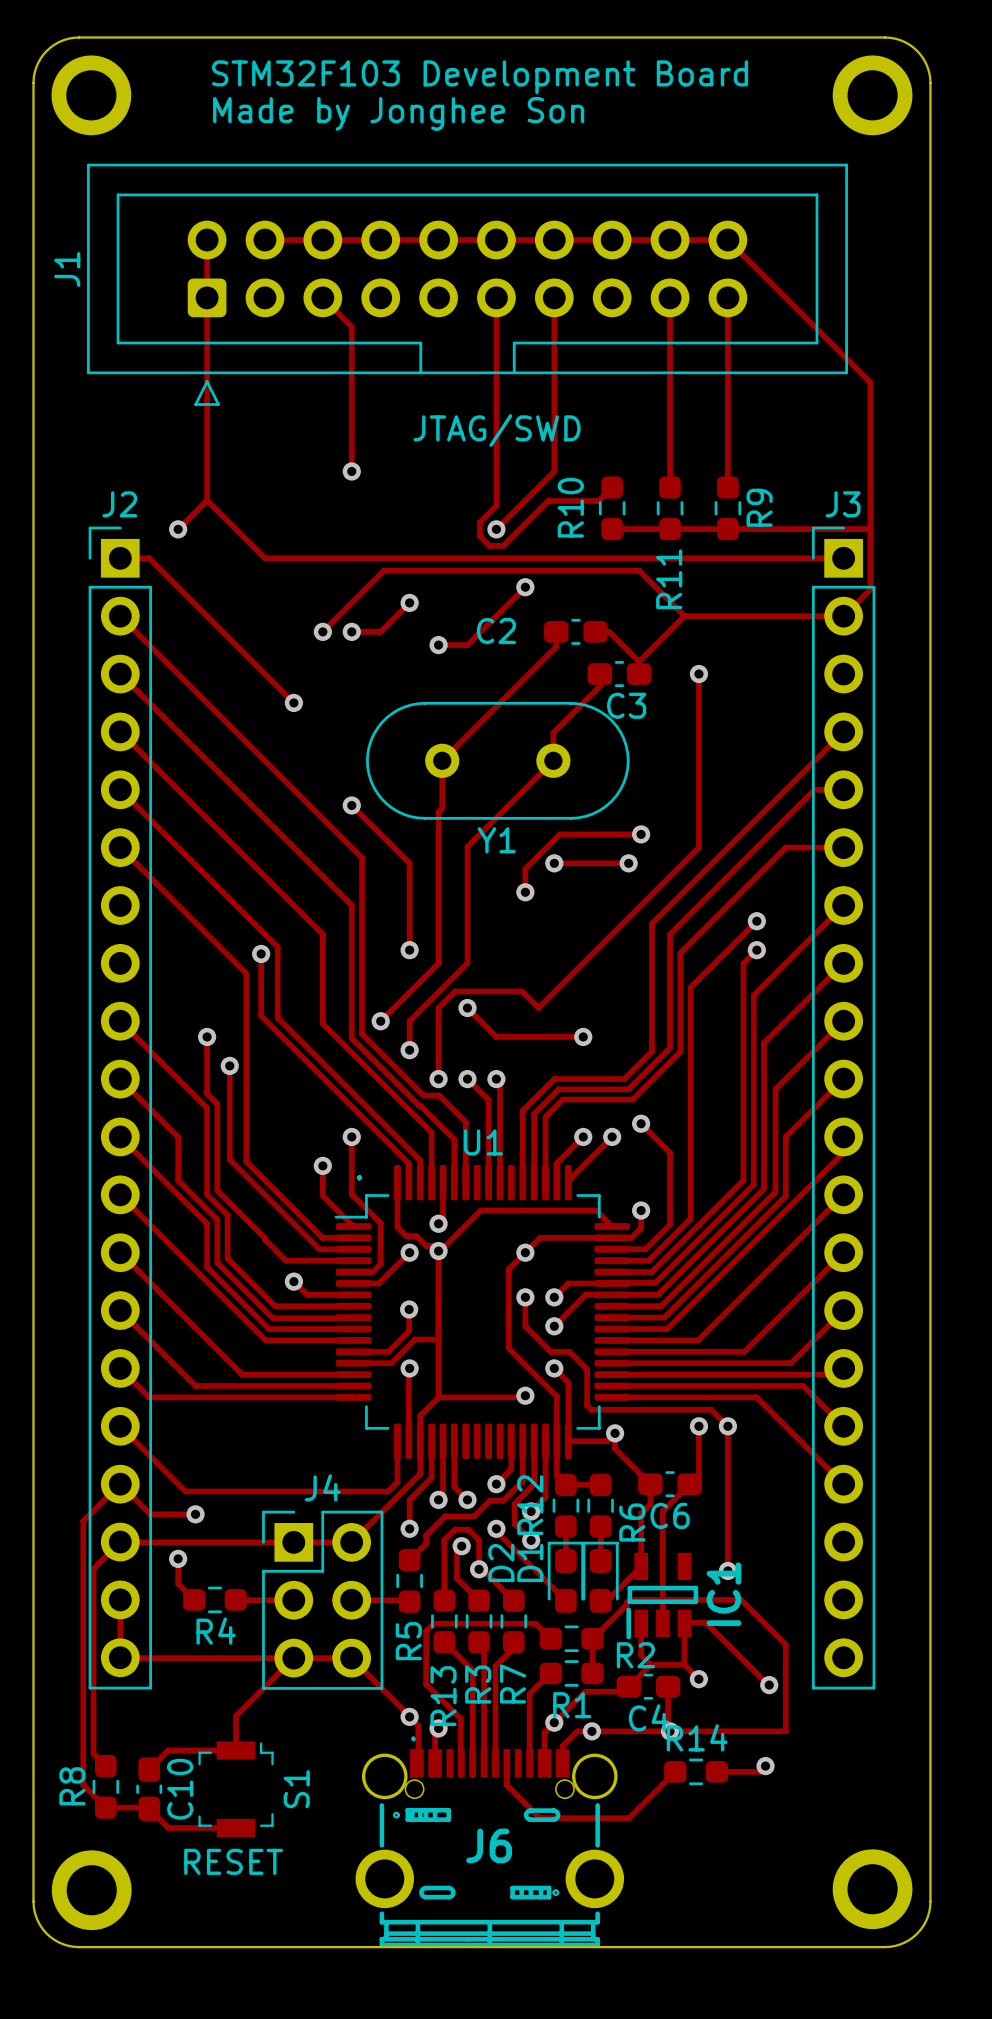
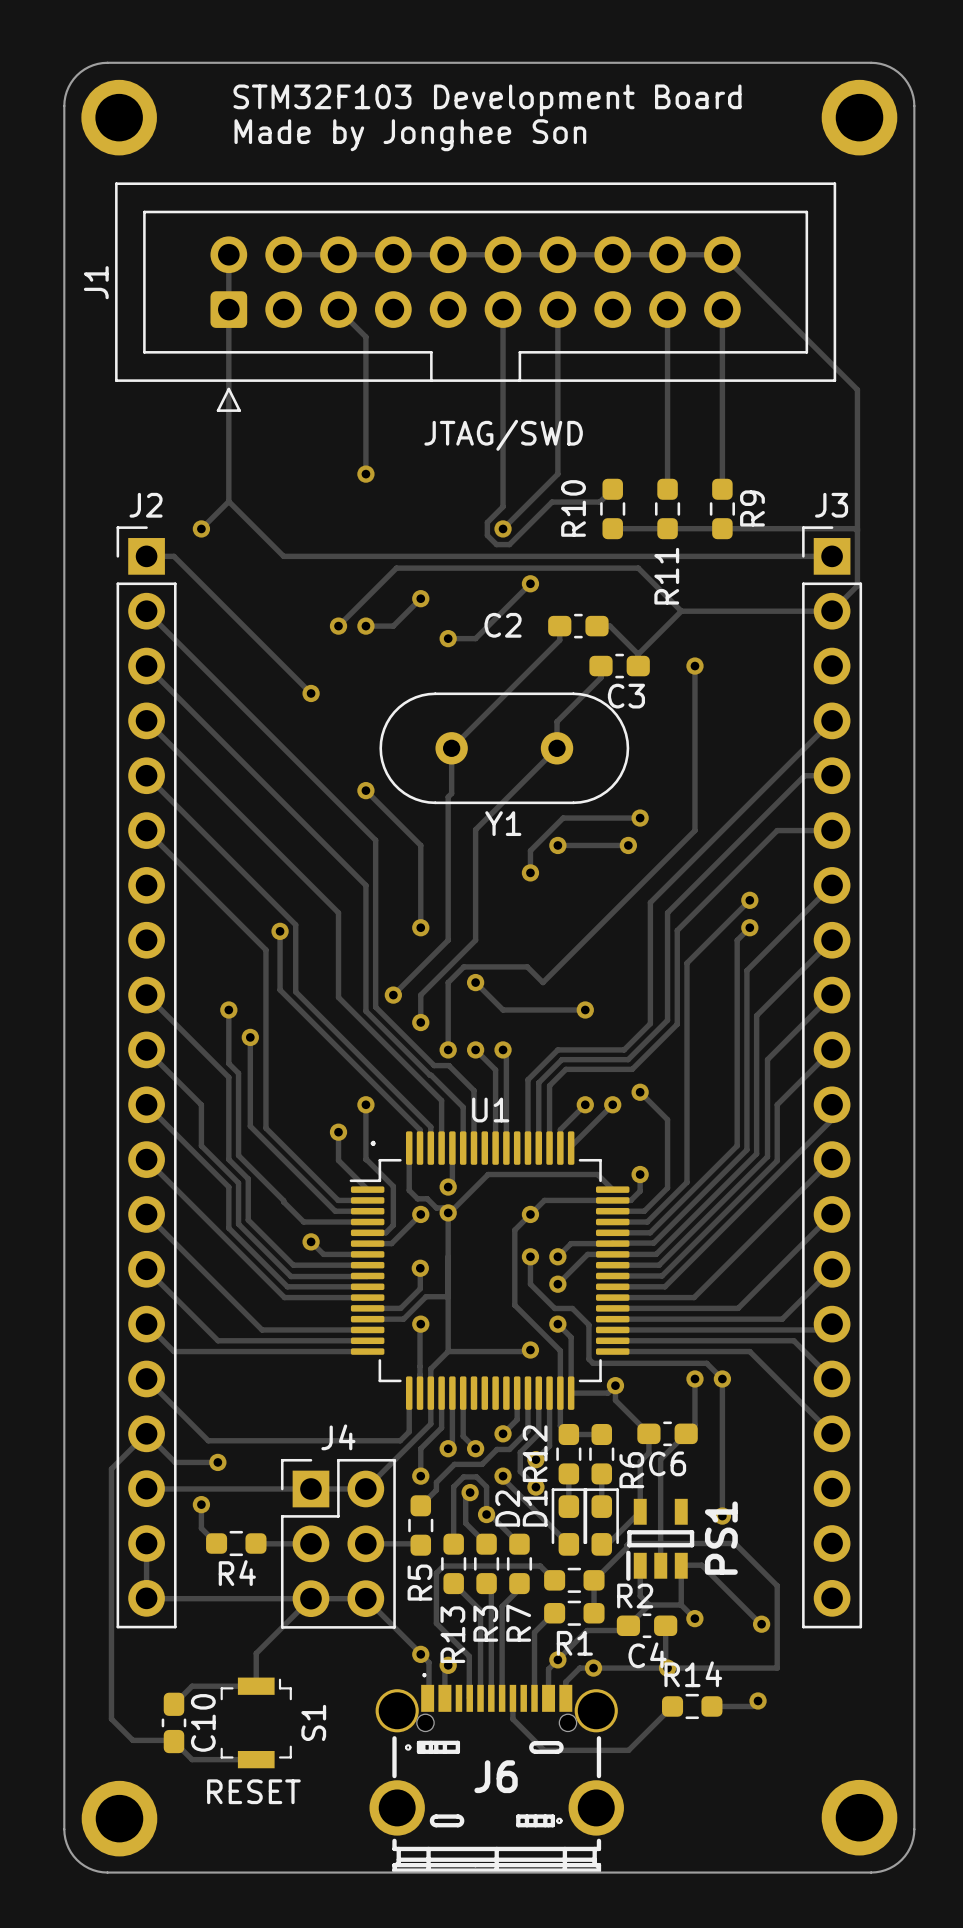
track: (120, 1542) (93, 1568) (93, 1753) (105, 1766) -> none
IC1 name: IC1 (723, 1594) -> PS1 (721, 1538)
R8: (105, 1786) -> none

